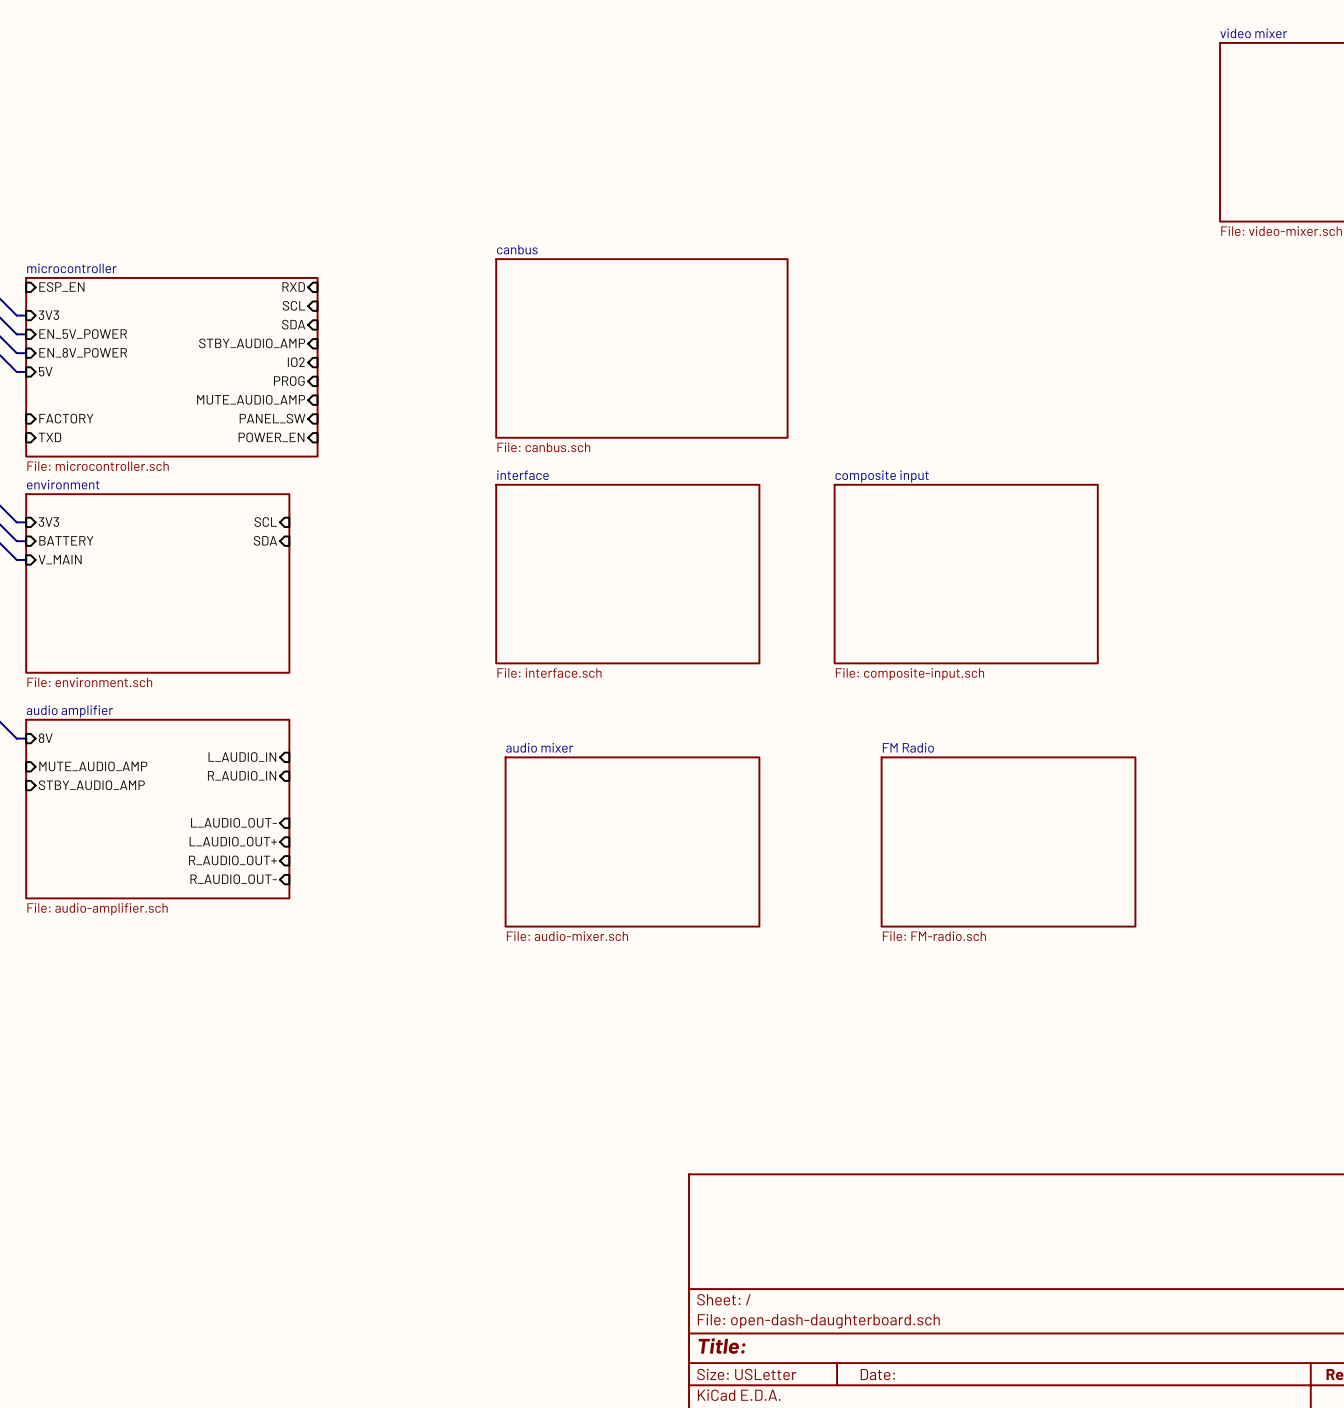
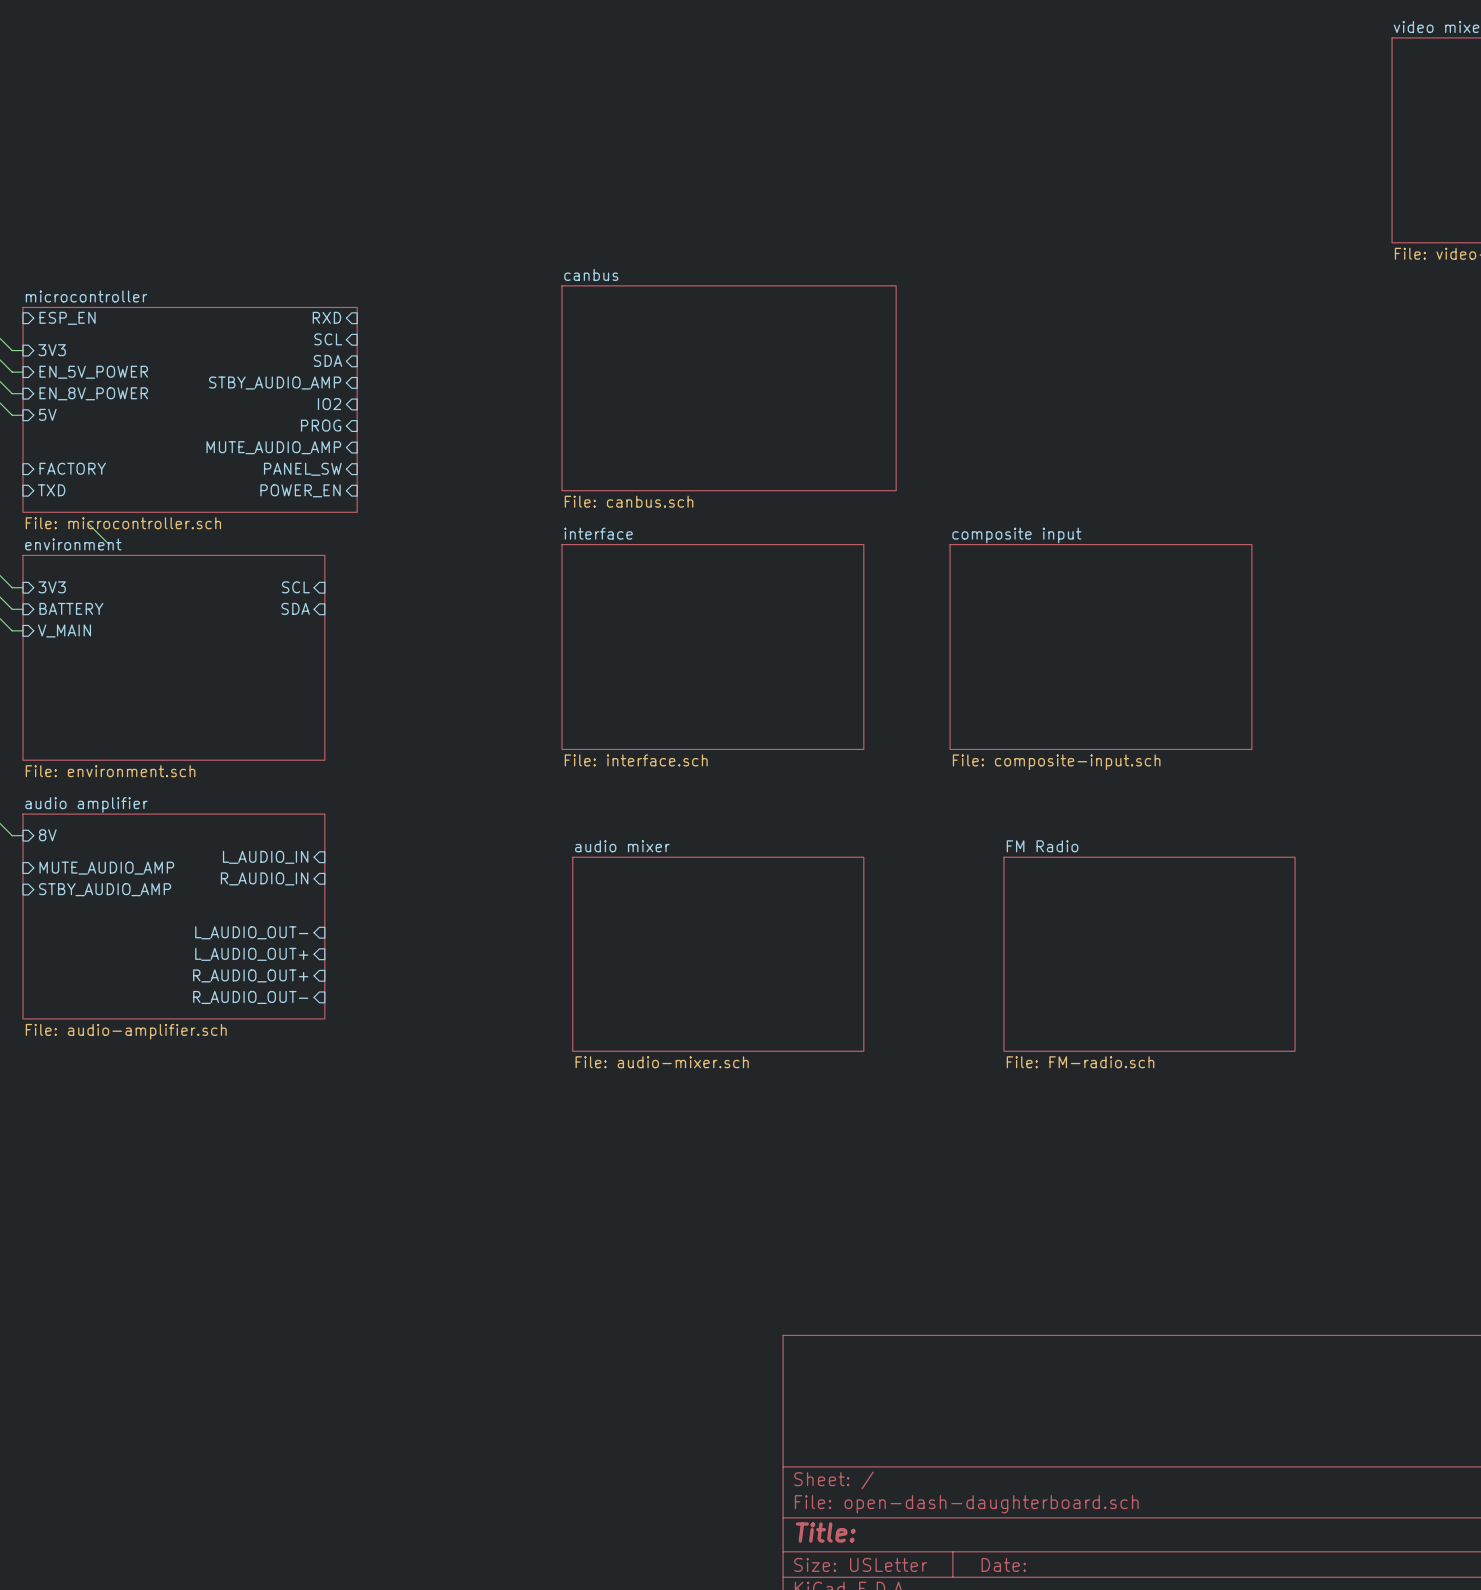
wire: none -> (87, 523) (109, 544)

